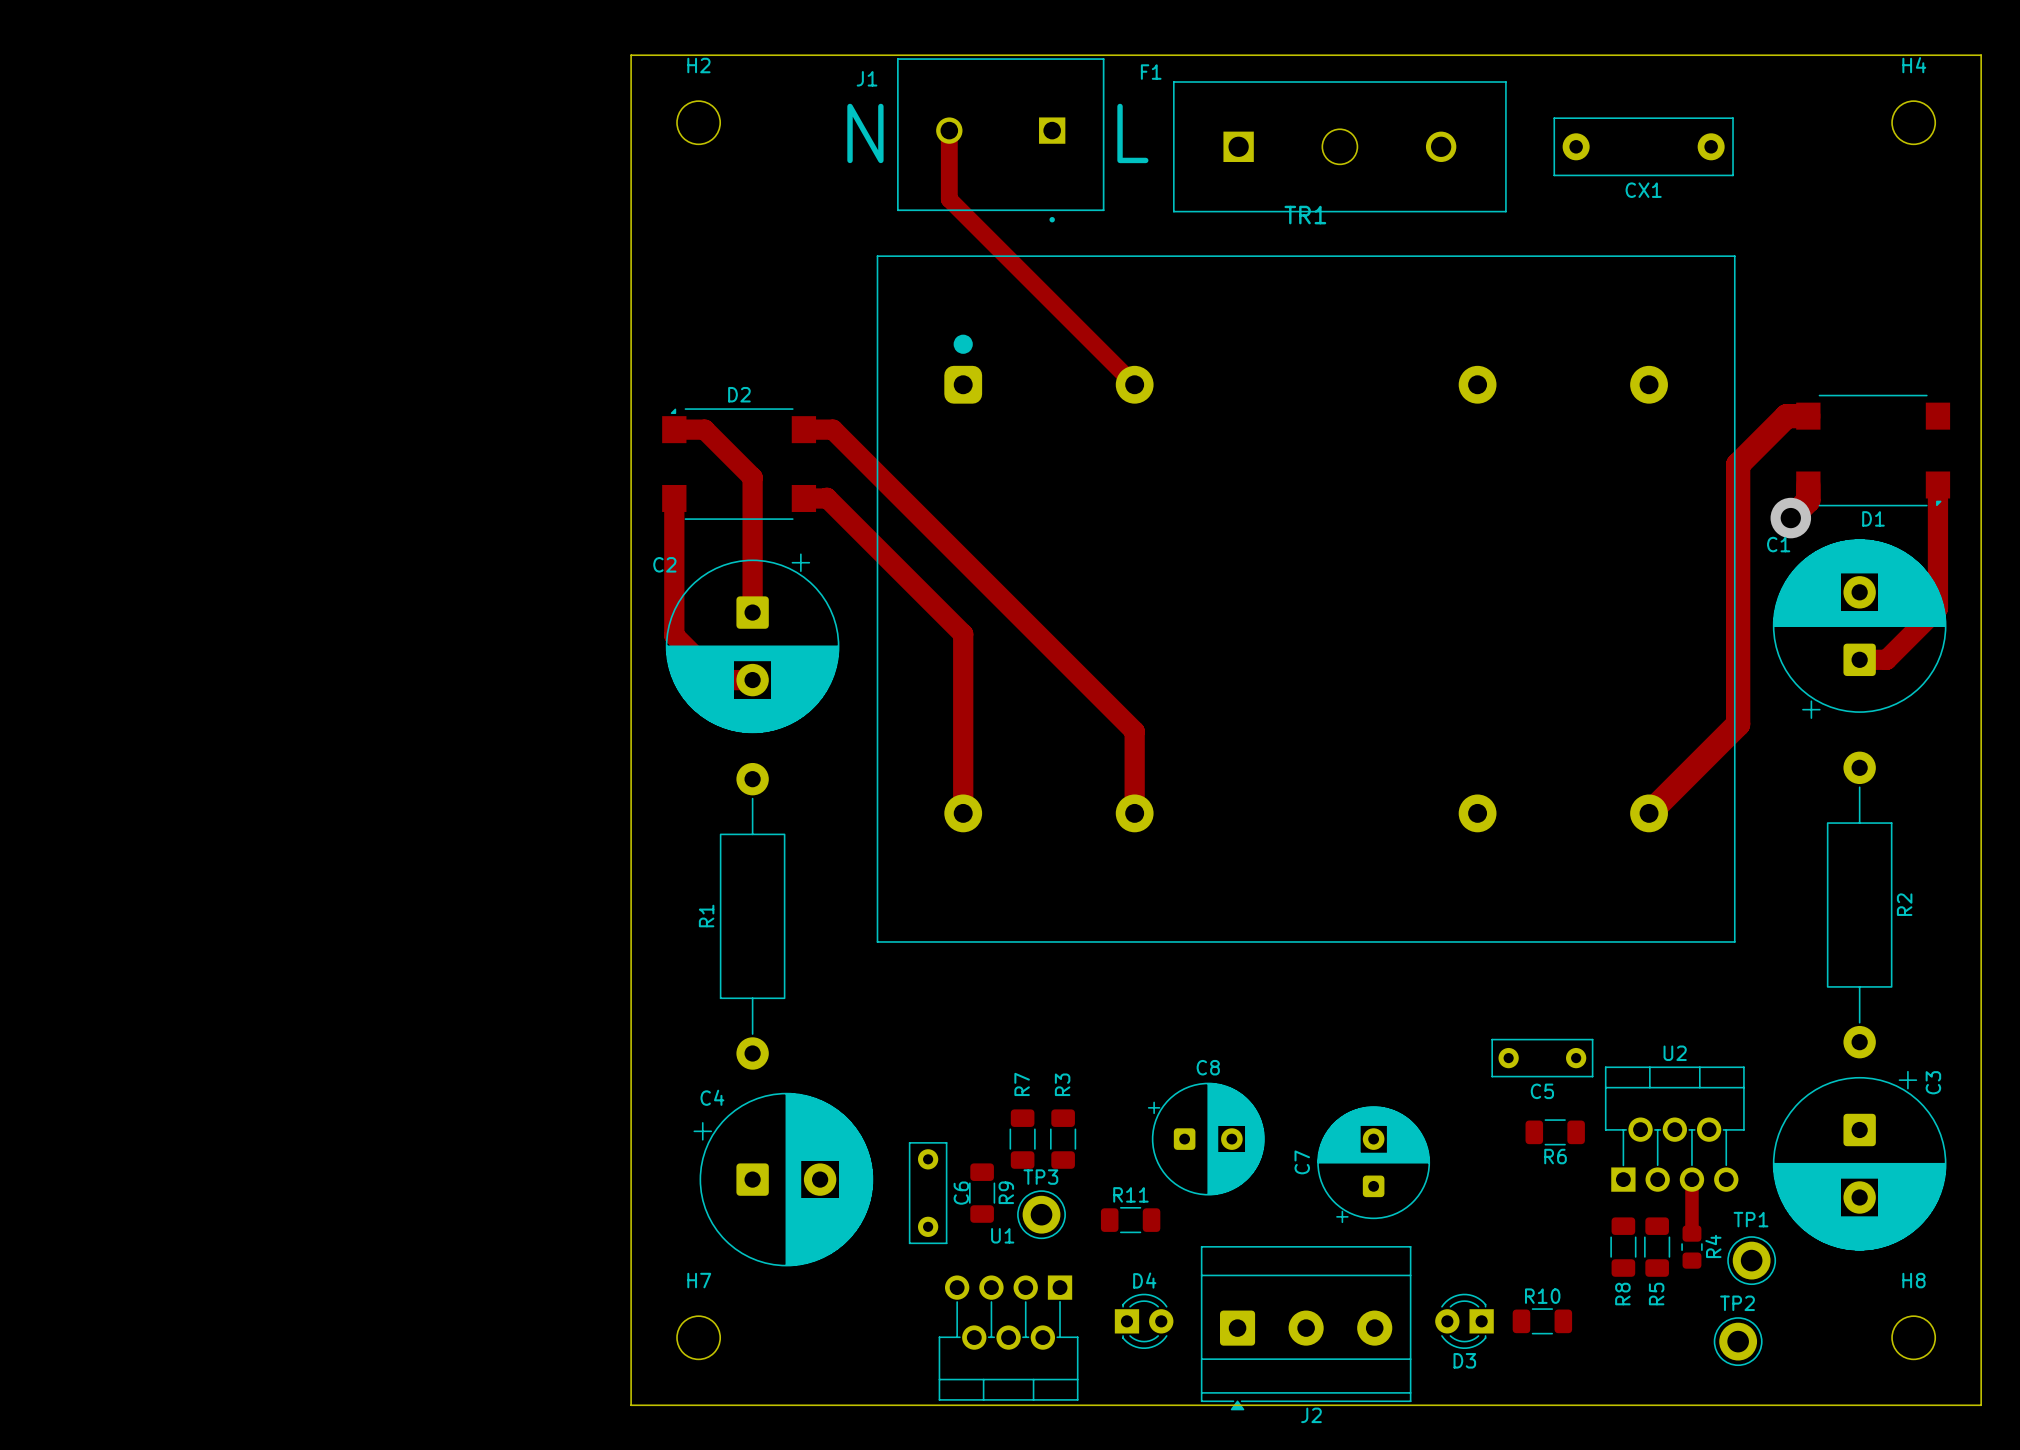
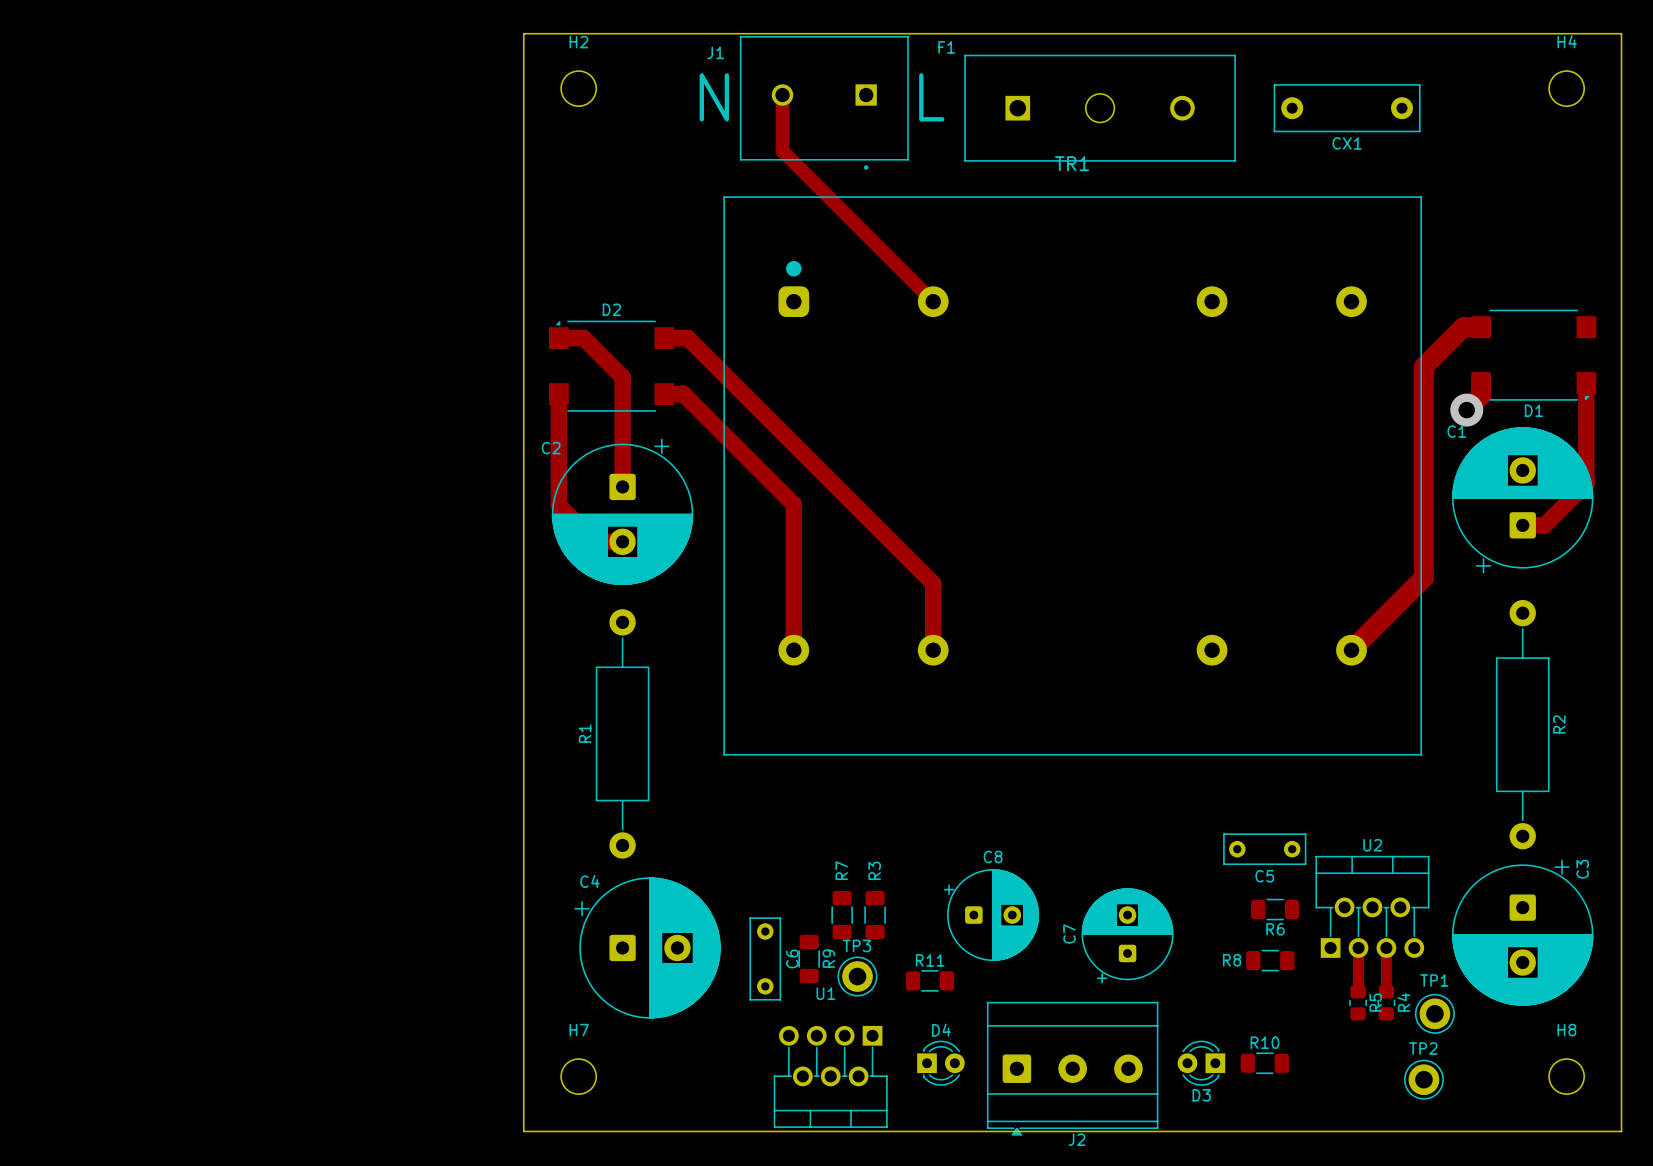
track: none -> (1358, 947) (1358, 991)
R5 footprint: [1644, 1217, 1671, 1277] -> [1349, 985, 1367, 1021]
R8 rotation: 0° (1623, 1247) -> 90° clockwise (1270, 960)
R8 position: (1623, 1247) -> (1270, 960)
R5 name position: R5 (1656, 1294) -> R5 (1375, 1002)

